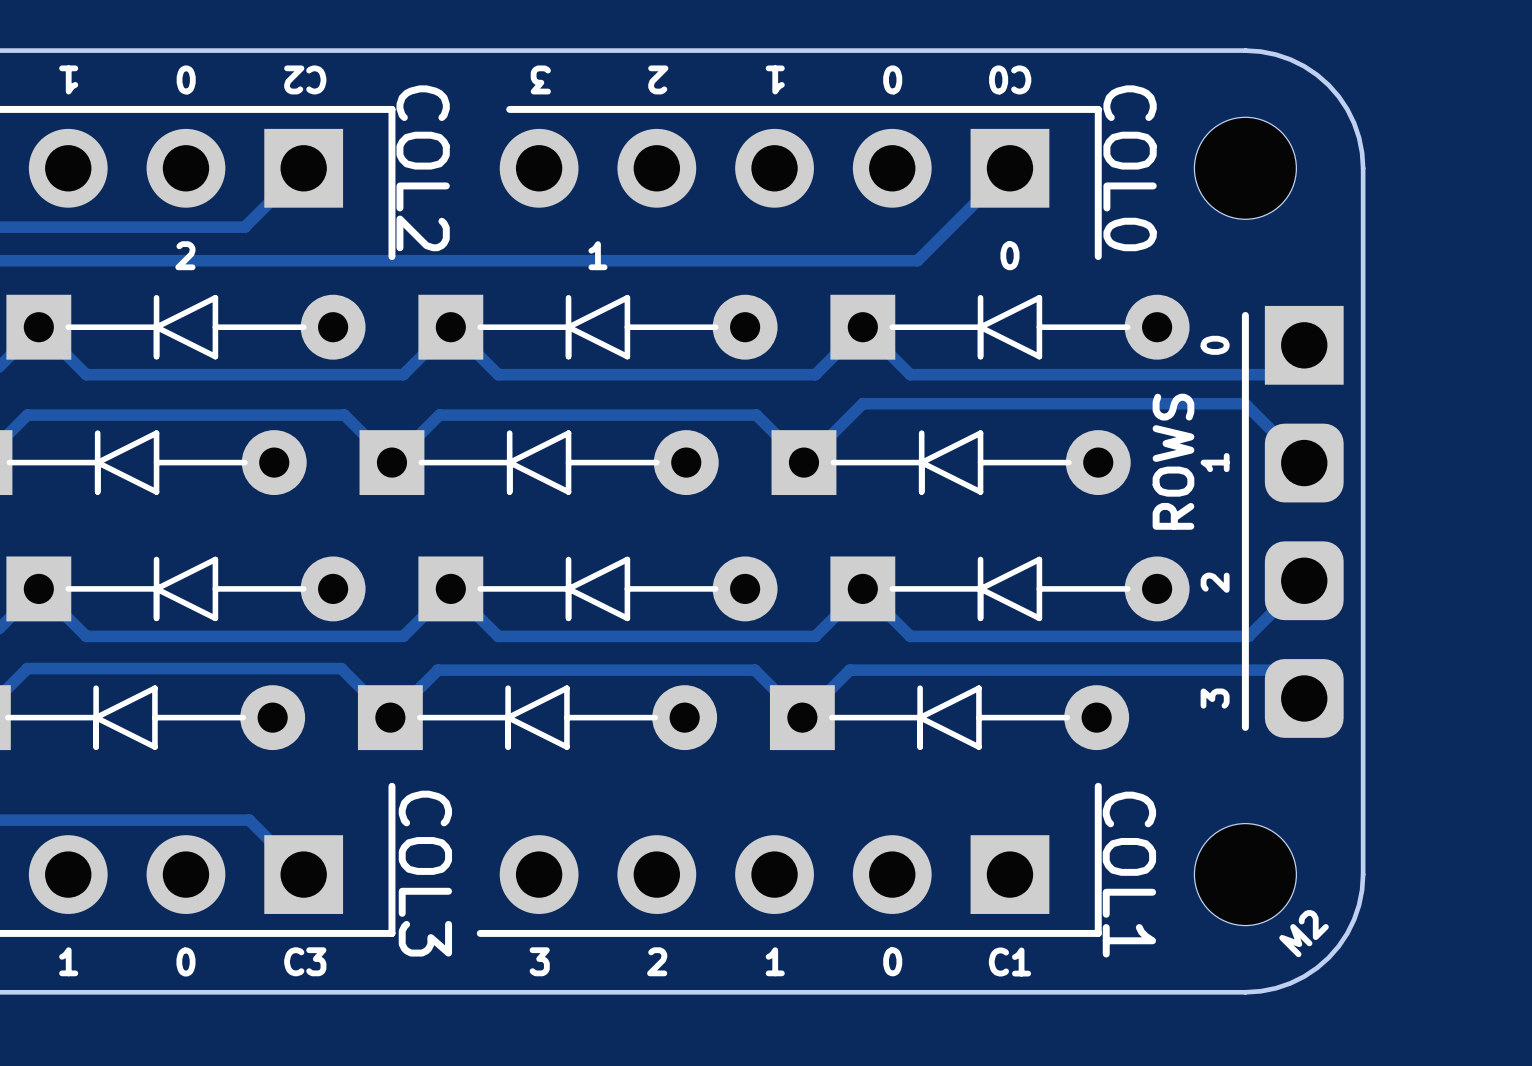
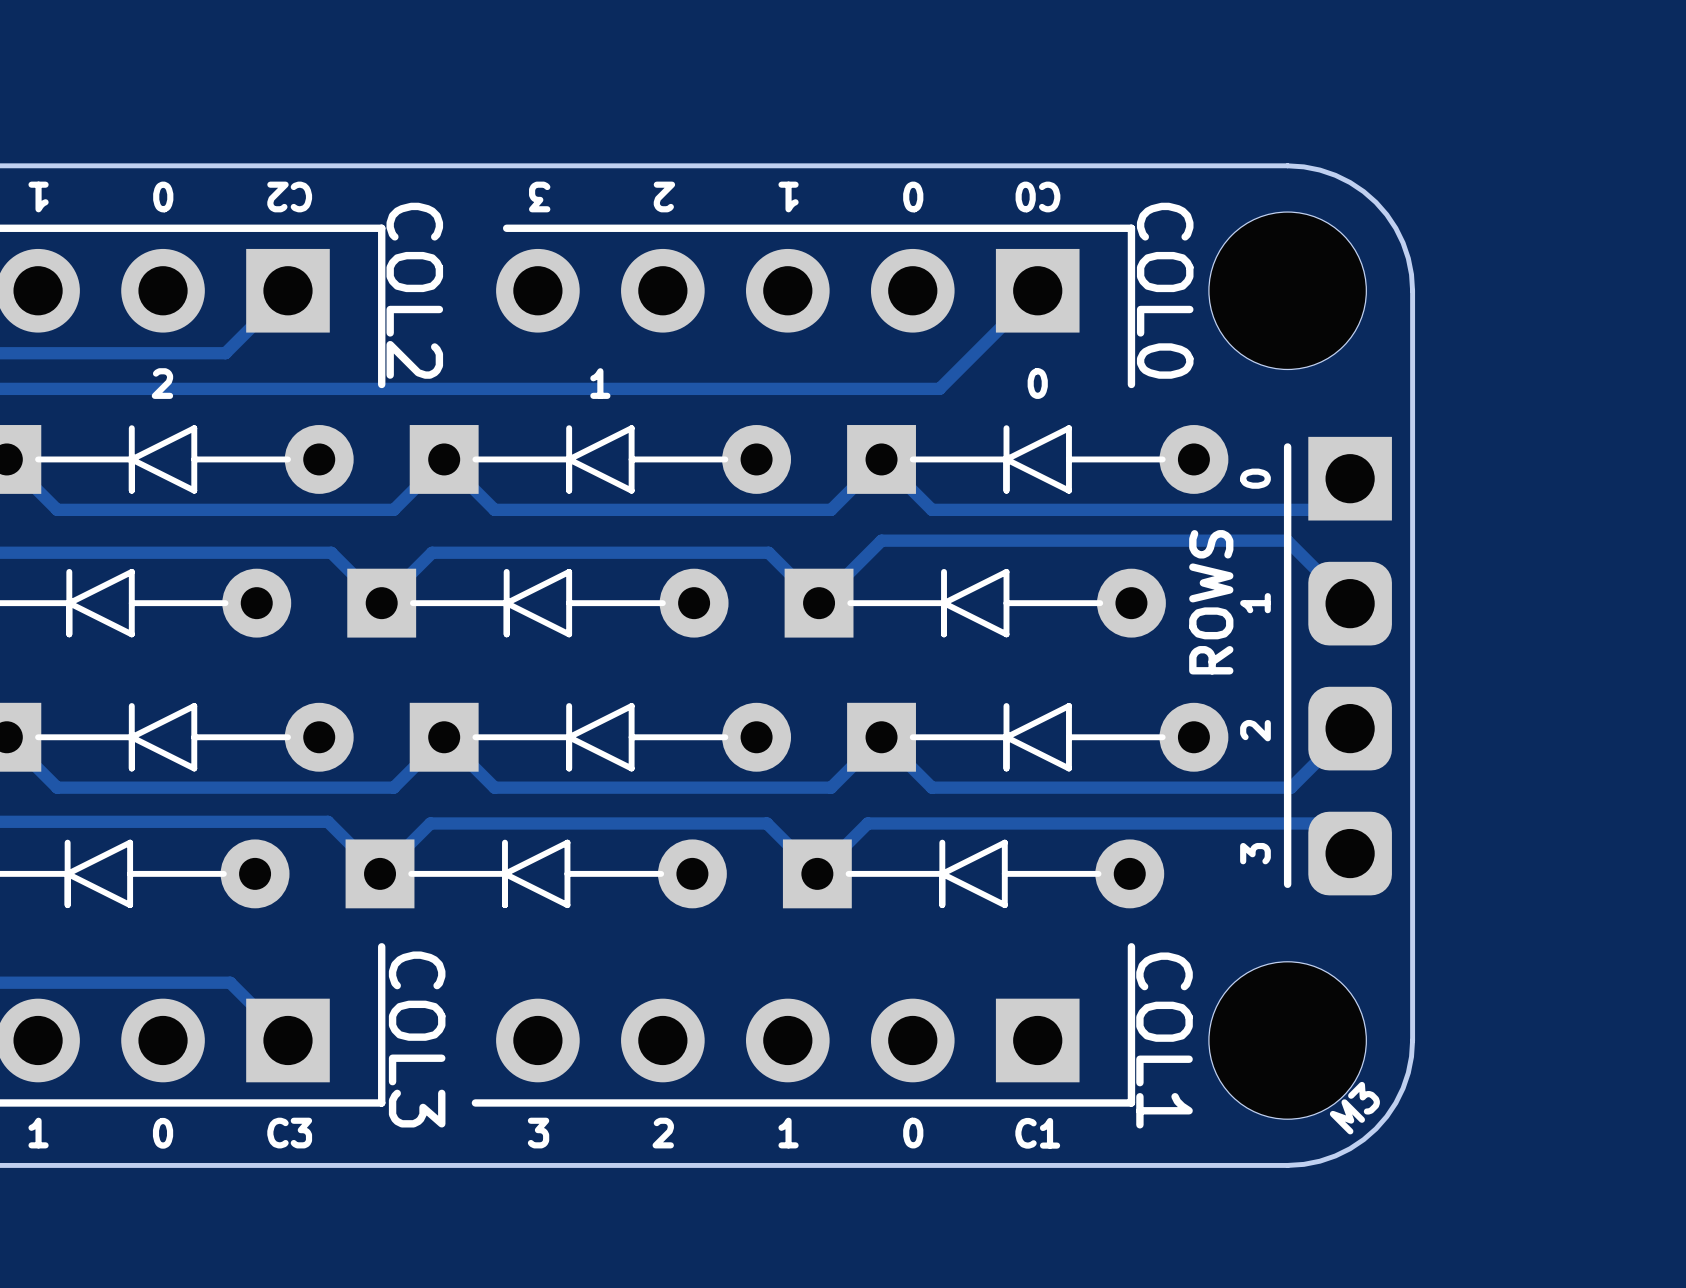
part footprint: [1194, 117, 1297, 220] -> [1208, 212, 1367, 370]
part footprint: [1194, 823, 1297, 926] -> [1208, 961, 1367, 1120]
text: M2 (1304, 933) -> M3 (1354, 1108)

